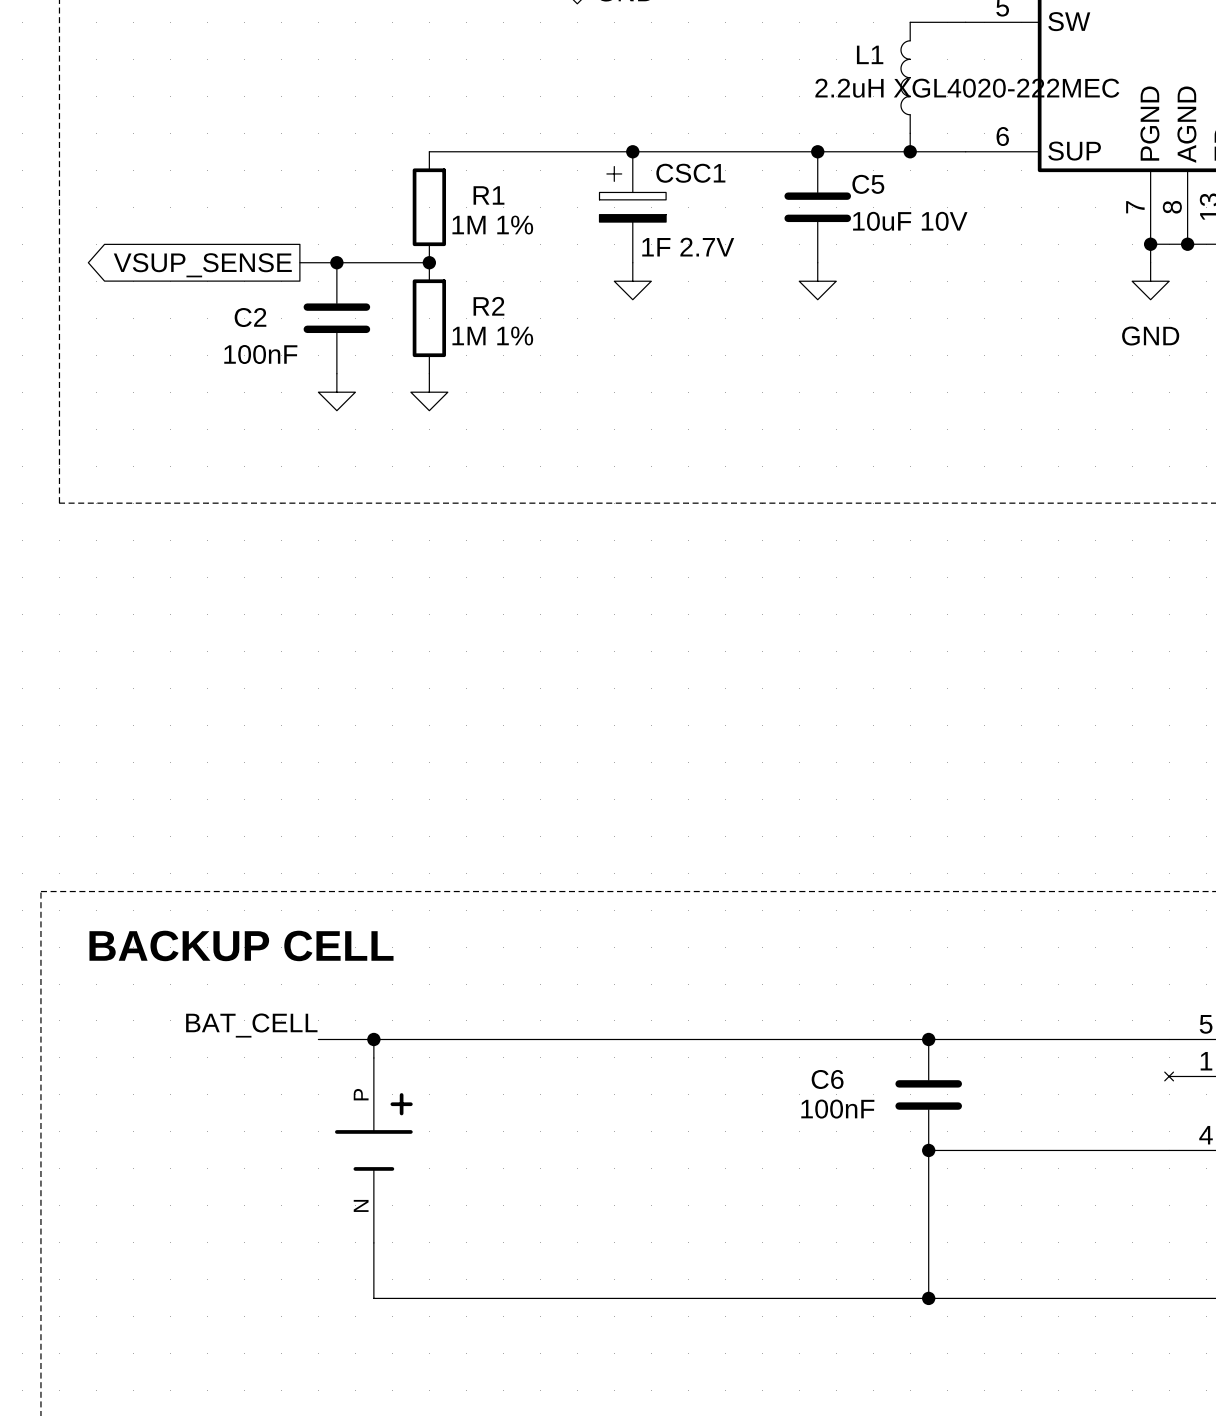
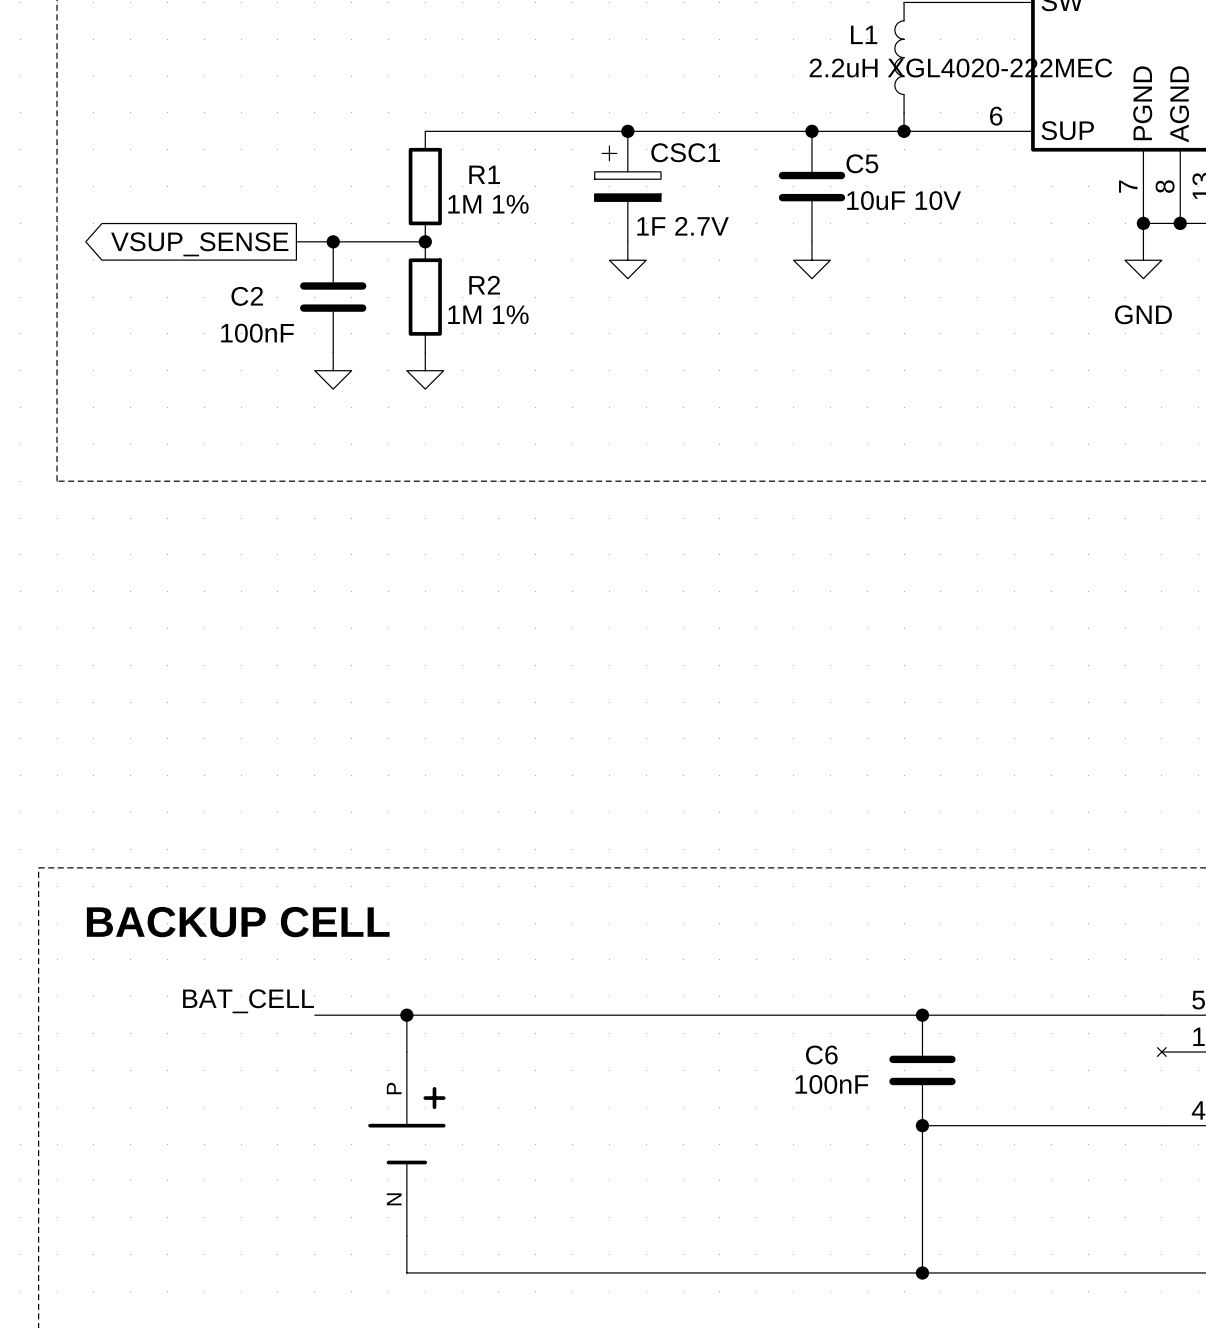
wire: (373, 1039) (373, 1057) -> none
junction position: (373, 1039) -> (406, 1015)
wire: none -> (406, 1015) (406, 1052)
part position: (373, 1150) -> (406, 1144)
wire: (373, 1242) (373, 1298) (410, 1298) -> (406, 1236) (406, 1272)

